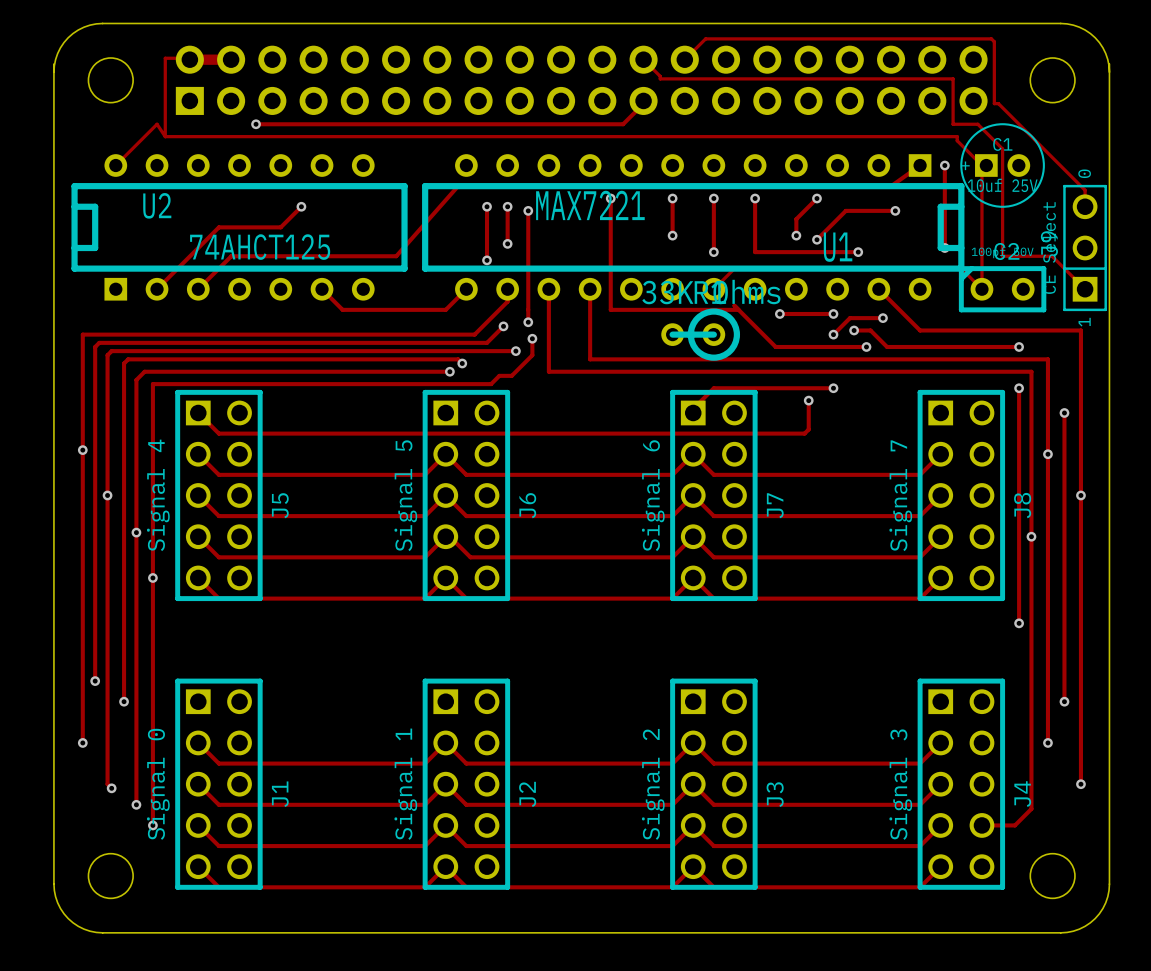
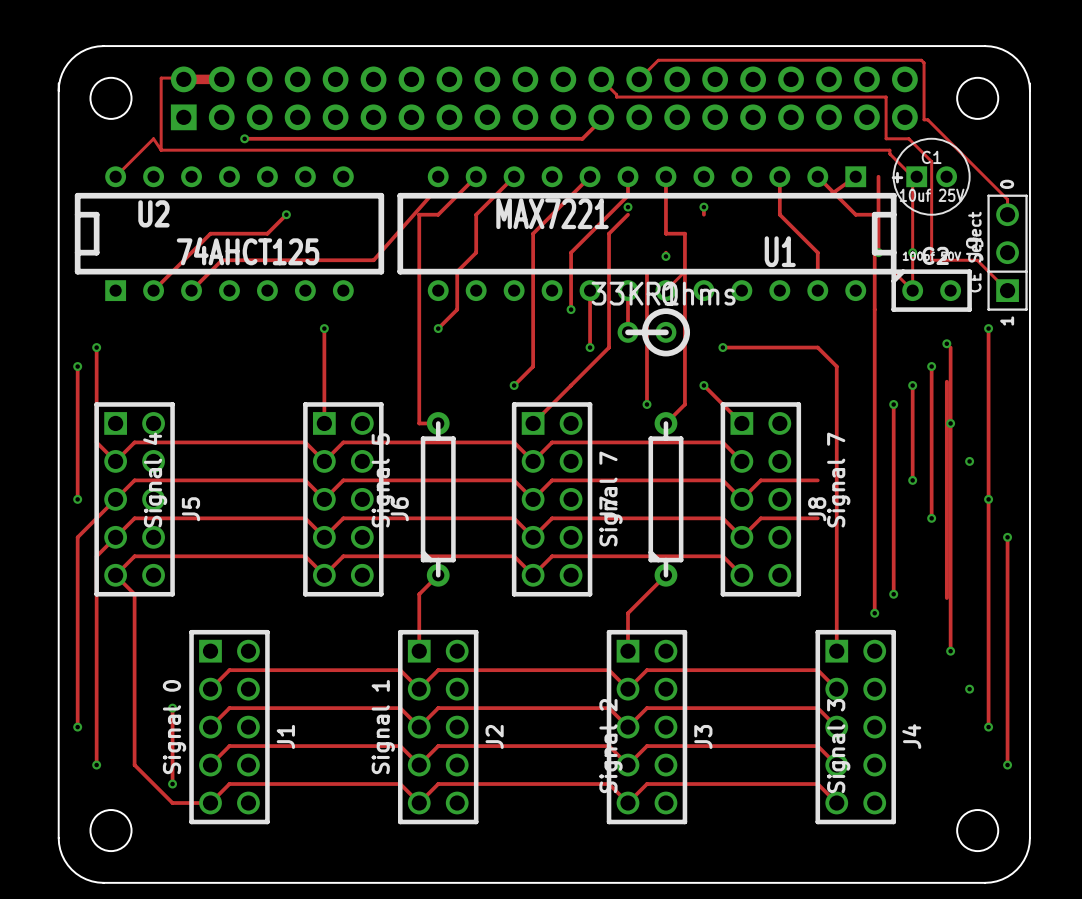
track: none -> (514, 176) (476, 214)
track: none -> (590, 176) (533, 233) (533, 366) (514, 385)
track: none -> (665, 176) (665, 207)
track: none -> (779, 176) (779, 214) (817, 252) (817, 271)
track: none -> (817, 176) (855, 214) (874, 214) (874, 613)
via: (944, 165) -> none
track: (610, 198) (610, 248) -> (628, 176) (628, 195) (571, 252)
via: (610, 198) -> none
track: (672, 198) (672, 235) -> none
via: (713, 198) -> none
track: (816, 198) (796, 219) (796, 235) -> none
via: (816, 198) -> none
track: (487, 206) (487, 260) -> none
via: (487, 206) -> none
via: (507, 206) -> none
track: none -> (628, 214) (609, 233) (609, 347) (533, 423)
track: (755, 206) (755, 252) (858, 252) -> none
track: (528, 210) (528, 322) -> none
via: (528, 210) -> none
track: (895, 210) (845, 210) (816, 239) -> none
via: (895, 210) -> none
track: (713, 227) (713, 248) -> (665, 233) (684, 233) (684, 404) (665, 423)
via: (672, 235) -> none
via: (796, 235) -> none
via: (816, 239) -> none
track: none -> (476, 248) (476, 252) (457, 271) (457, 309) (438, 328)
via: (507, 243) -> none
via: none -> (912, 252)
via: (858, 252) -> none
via: (487, 260) -> none
track: (322, 289) (342, 309) (445, 309) (466, 289) -> none
track: (507, 289) (507, 301) (474, 334) (82, 334) (82, 742) -> none
track: (548, 289) (548, 371) (1031, 371) (1031, 808) (1014, 825) (981, 825) -> none
track: (590, 289) (590, 359) (1047, 359) (1047, 742) -> none
track: none -> (590, 290) (590, 347)
track: none -> (628, 290) (628, 332)
track: (878, 289) (920, 330) (1080, 330) (1080, 784) -> none
track: (734, 305) (775, 346) (866, 346) -> none
track: (610, 309) (738, 309) -> none
via: none -> (571, 309)
track: (779, 313) (833, 313) -> none
via: (779, 313) -> none
via: (833, 313) -> none
track: (882, 318) (849, 318) (833, 334) -> none
via: (882, 318) -> none
via: (528, 322) -> none
track: (503, 326) (487, 342) (99, 342) (95, 346) (95, 351) -> none
via: (503, 326) -> none
track: none -> (324, 328) (324, 423)
via: none -> (324, 328)
via: none -> (438, 328)
track: (854, 330) (870, 330) (887, 346) (1019, 346) -> none
via: (854, 330) -> none
track: none -> (988, 328) (988, 404)
via: none -> (988, 328)
via: (833, 334) -> none
track: (532, 338) (532, 355) (511, 375) (499, 375) (491, 384) (152, 384) (152, 825) -> none
via: (532, 338) -> none
via: (866, 346) -> none
via: none -> (96, 347)
track: (515, 351) (111, 351) (107, 355) (107, 784) (111, 788) -> none
via: (515, 351) -> none
via: none -> (590, 347)
track: none -> (722, 347) (817, 347) (836, 366) (836, 651)
via: none -> (722, 347)
track: none -> (950, 347) (950, 651)
track: (462, 363) (458, 359) (128, 359) (124, 363) (124, 701) -> none
via: (462, 363) -> none
track: none -> (77, 366) (77, 499)
via: none -> (77, 366)
track: (449, 371) (144, 371) (136, 379) (136, 619) -> (741, 575) (722, 556) (552, 556) (533, 575) (514, 556) (343, 556) (324, 575) (305, 556) (134, 556) (115, 575) (134, 594)
via: (449, 371) -> none
track: none -> (931, 366) (931, 518)
via: none -> (931, 366)
track: (833, 388) (713, 388) (693, 408) -> (646, 271) (646, 400)
via: (833, 388) -> none
via: (1019, 388) -> none
via: none -> (514, 385)
track: none -> (703, 385) (741, 423)
via: none -> (703, 385)
track: none -> (912, 385) (912, 480)
via: none -> (912, 385)
track: (808, 400) (808, 429) (804, 433) (466, 433) -> none
via: (808, 400) -> none
track: (198, 412) (218, 433) (445, 433) -> (476, 176) (438, 214) (419, 214) (419, 423)
via: none -> (646, 404)
track: none -> (893, 404) (893, 594)
via: none -> (893, 404)
via: (1064, 412) -> none
via: none -> (950, 423)
via: (82, 450) -> none
track: (95, 454) (95, 577) -> (96, 442) (115, 461) (134, 442) (305, 442) (324, 461) (343, 442) (514, 442) (533, 461) (552, 442) (722, 442) (741, 461)
track: (198, 454) (218, 474) (425, 474) (445, 454) (466, 474) (672, 474) (693, 454) (713, 474) (920, 474) (940, 454) -> none
via: (1047, 454) -> none
via: none -> (969, 461)
via: (107, 495) -> none
track: (198, 495) (218, 516) (425, 516) (445, 495) (466, 516) (672, 516) (693, 495) (713, 516) (920, 516) (940, 495) -> none
J5 position: (218, 495) -> (134, 499)
J6 position: (466, 495) -> (343, 499)
J7 value: Signal 6 (653, 495) -> Signal 7 (610, 499)
J7 position: (713, 495) -> (552, 499)
track: none -> (817, 480) (760, 480) (741, 499) (722, 480) (552, 480) (533, 499) (514, 480) (343, 480) (324, 499) (305, 480) (134, 480) (77, 537) (77, 727)
J8 position: (961, 495) -> (760, 499)
via: none -> (912, 480)
via: (1080, 495) -> none
via: none -> (77, 499)
part: none -> (438, 499)
part: none -> (665, 499)
via: none -> (988, 499)
via: (136, 532) -> none
track: (198, 536) (218, 557) (425, 557) (445, 536) -> (96, 556) (134, 518) (305, 518) (324, 537) (343, 518) (419, 518)
track: (449, 536) (470, 557) (672, 557) (693, 536) (713, 557) (920, 557) (940, 536) -> (423, 518) (514, 518) (533, 537) (552, 518) (722, 518) (741, 537) (760, 518) (817, 518)
via: none -> (931, 518)
via: (1031, 536) -> none
track: none -> (1007, 537) (1007, 765)
via: none -> (1007, 537)
via: (152, 577) -> none
track: (198, 577) (218, 598) (425, 598) (445, 577) (466, 598) (672, 598) (693, 577) (713, 598) (920, 598) (940, 577) -> none
track: none -> (438, 575) (419, 594) (419, 651)
track: none -> (665, 575) (628, 613) (628, 651)
via: none -> (893, 594)
via: (1019, 623) -> none
via: none -> (874, 613)
track: none -> (96, 651) (96, 765)
via: (95, 681) -> none
via: none -> (950, 651)
via: (124, 701) -> none
track: none -> (988, 670) (988, 727)
via: (1064, 701) -> none
track: none -> (210, 689) (229, 670) (400, 670) (419, 689) (438, 670) (609, 670) (628, 689) (646, 670) (817, 670) (836, 689)
via: none -> (969, 689)
via: (82, 742) -> none
track: none -> (172, 708) (172, 784)
via: none -> (172, 708)
track: (198, 742) (218, 763) (425, 763) (445, 742) (466, 763) (672, 763) -> (210, 727) (229, 708) (400, 708) (419, 727) (438, 708) (609, 708) (628, 727)
track: (693, 742) (713, 763) (920, 763) (940, 742) -> (646, 708) (817, 708) (836, 727)
via: (1047, 742) -> none
via: none -> (77, 727)
via: none -> (988, 727)
track: (198, 784) (218, 804) (425, 804) (445, 784) (466, 804) (672, 804) -> (210, 765) (229, 746) (400, 746) (419, 765) (438, 746) (609, 746) (628, 765)
J1 position: (218, 784) -> (229, 727)
J2 position: (466, 784) -> (438, 727)
track: (693, 784) (713, 804) (920, 804) (940, 784) -> (646, 746) (817, 746) (836, 765)
J3 position: (713, 784) -> (646, 727)
J4 position: (961, 784) -> (855, 727)
via: (1080, 784) -> none
via: (111, 788) -> none
via: none -> (96, 765)
via: (136, 804) -> none
via: none -> (1007, 765)
via: (152, 825) -> none
via: none -> (172, 784)
track: (198, 825) (218, 846) (425, 846) (445, 825) (466, 846) (672, 846) -> (134, 765) (172, 803) (210, 803) (229, 784) (400, 784) (419, 803) (438, 784) (609, 784) (628, 803)
track: (693, 825) (713, 846) (920, 846) (940, 825) -> (646, 784) (817, 784) (836, 803)
track: (198, 866) (218, 887) (425, 887) (445, 866) (466, 887) (672, 887) (693, 866) (713, 887) (920, 887) (940, 866) -> none

